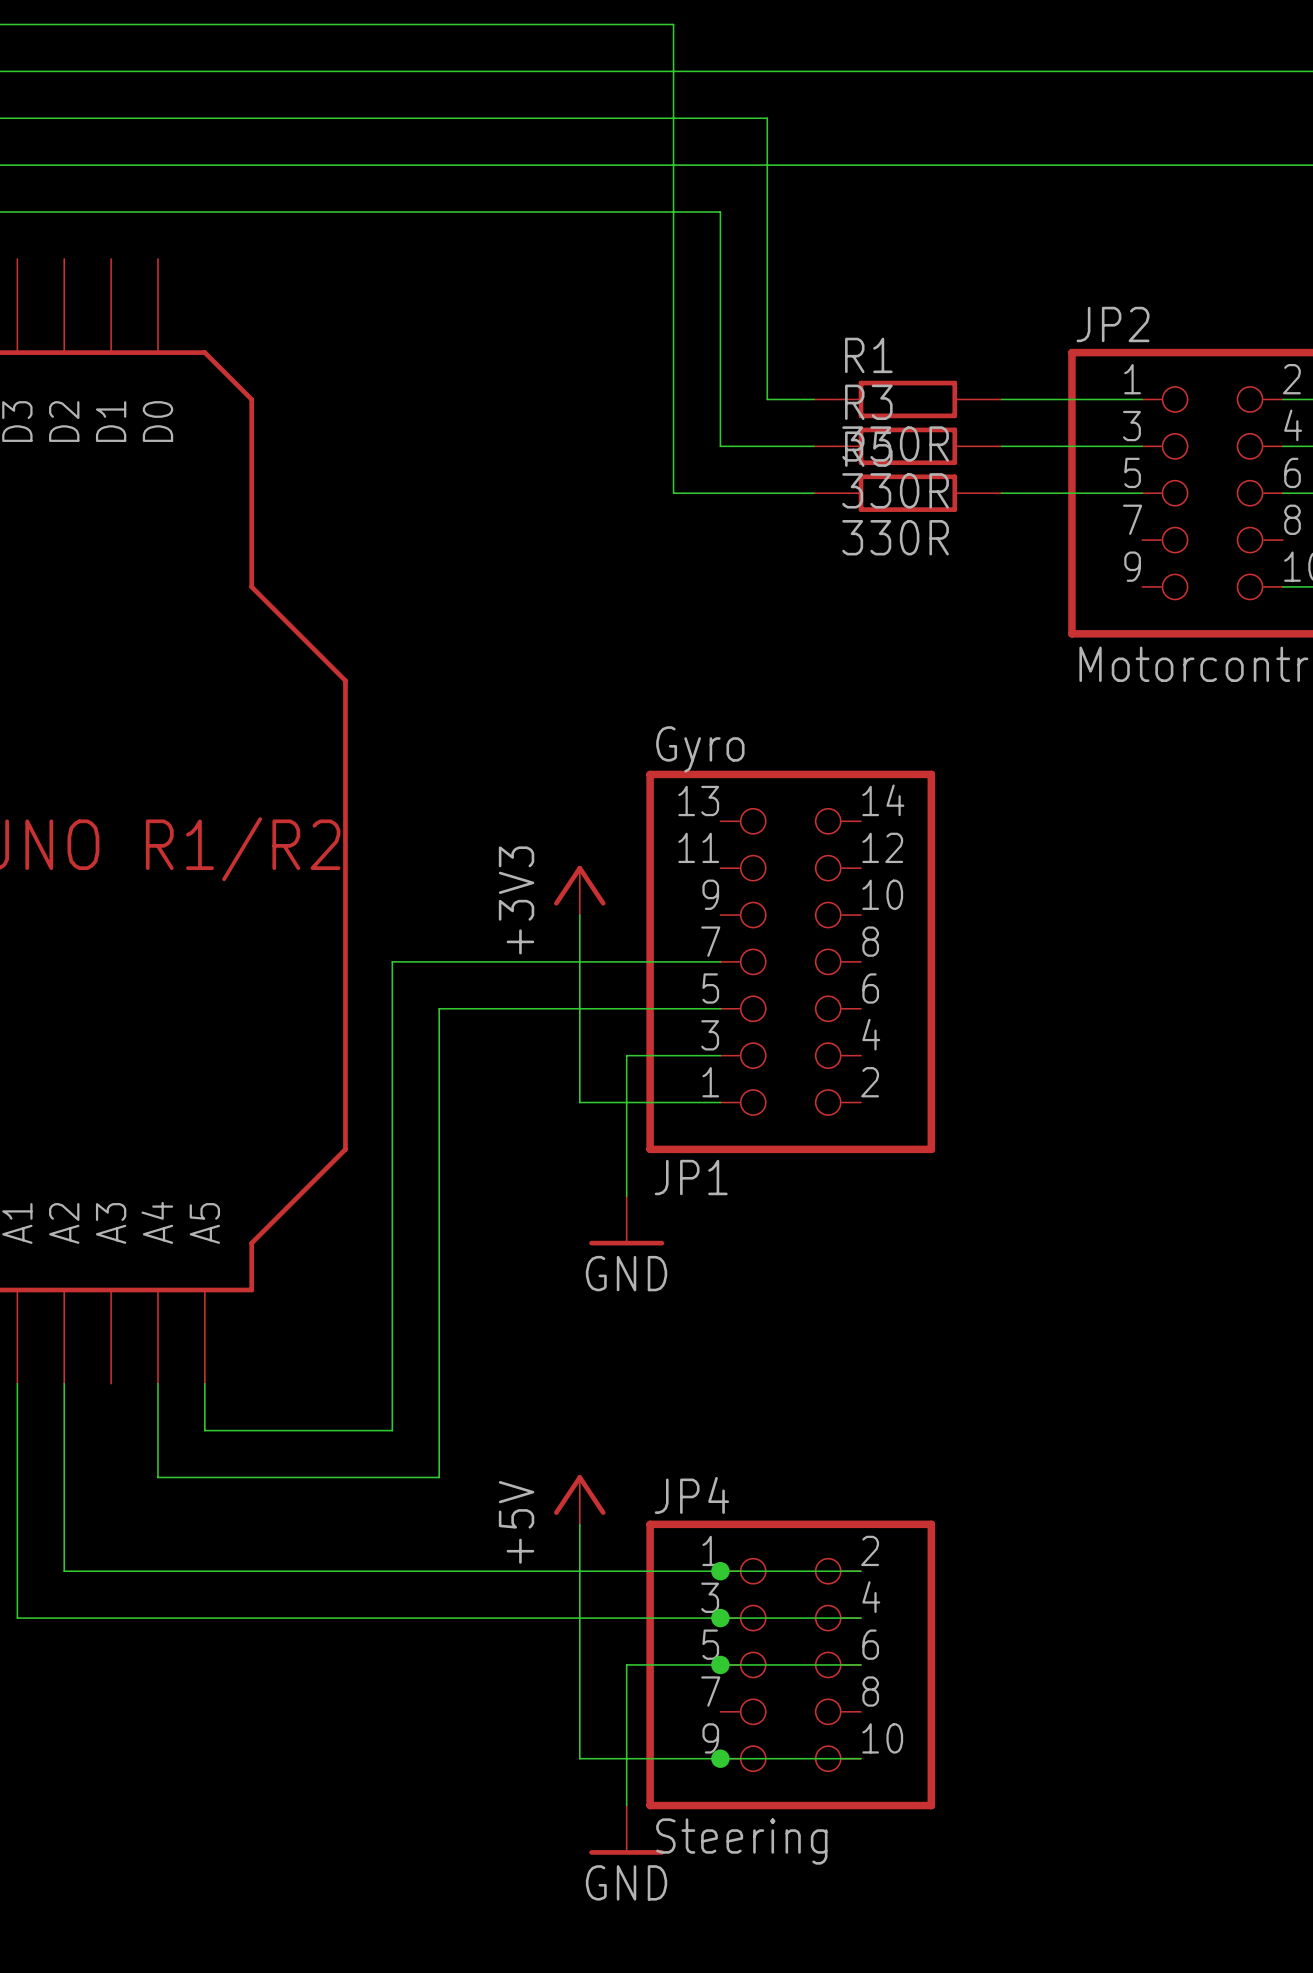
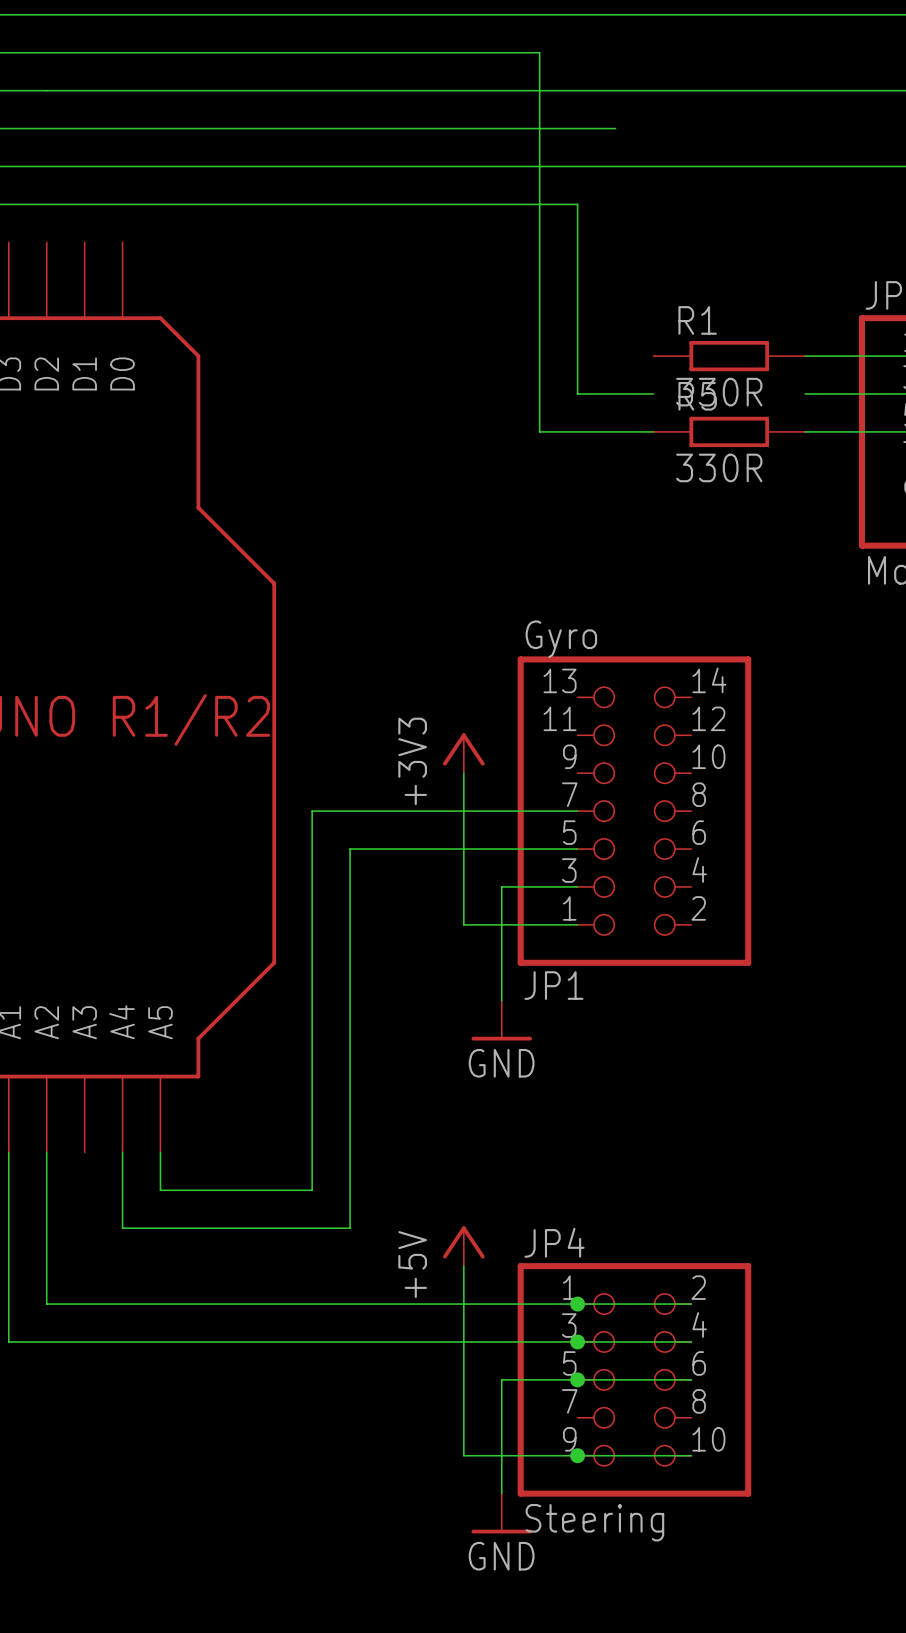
wire: (767, 118) (767, 399) (814, 399) -> none
R3: 330R (907, 446) -> none

